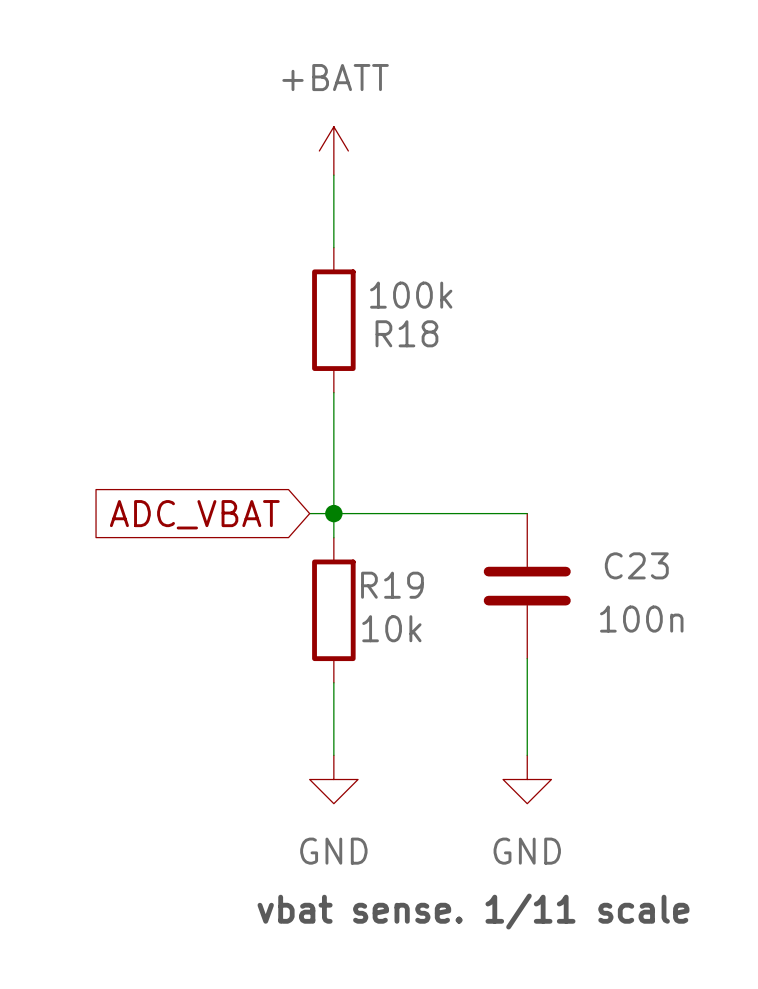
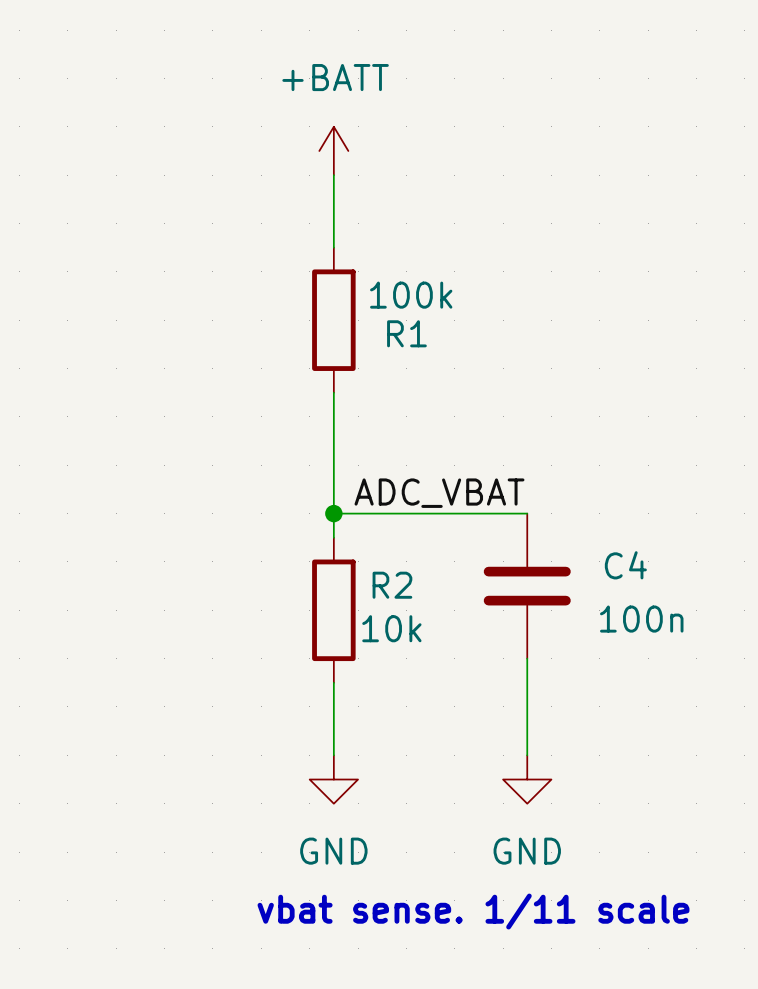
R18 name: R18 (406, 333) -> R1 (406, 333)
label: none -> ADC_VBAT (439, 493)
wire: (309, 513) (333, 513) -> none
global label: ADC_VBAT (194, 514) -> none
C23 name: C23 (636, 565) -> C4 (625, 565)
R19 name: R19 (392, 585) -> R2 (392, 585)

